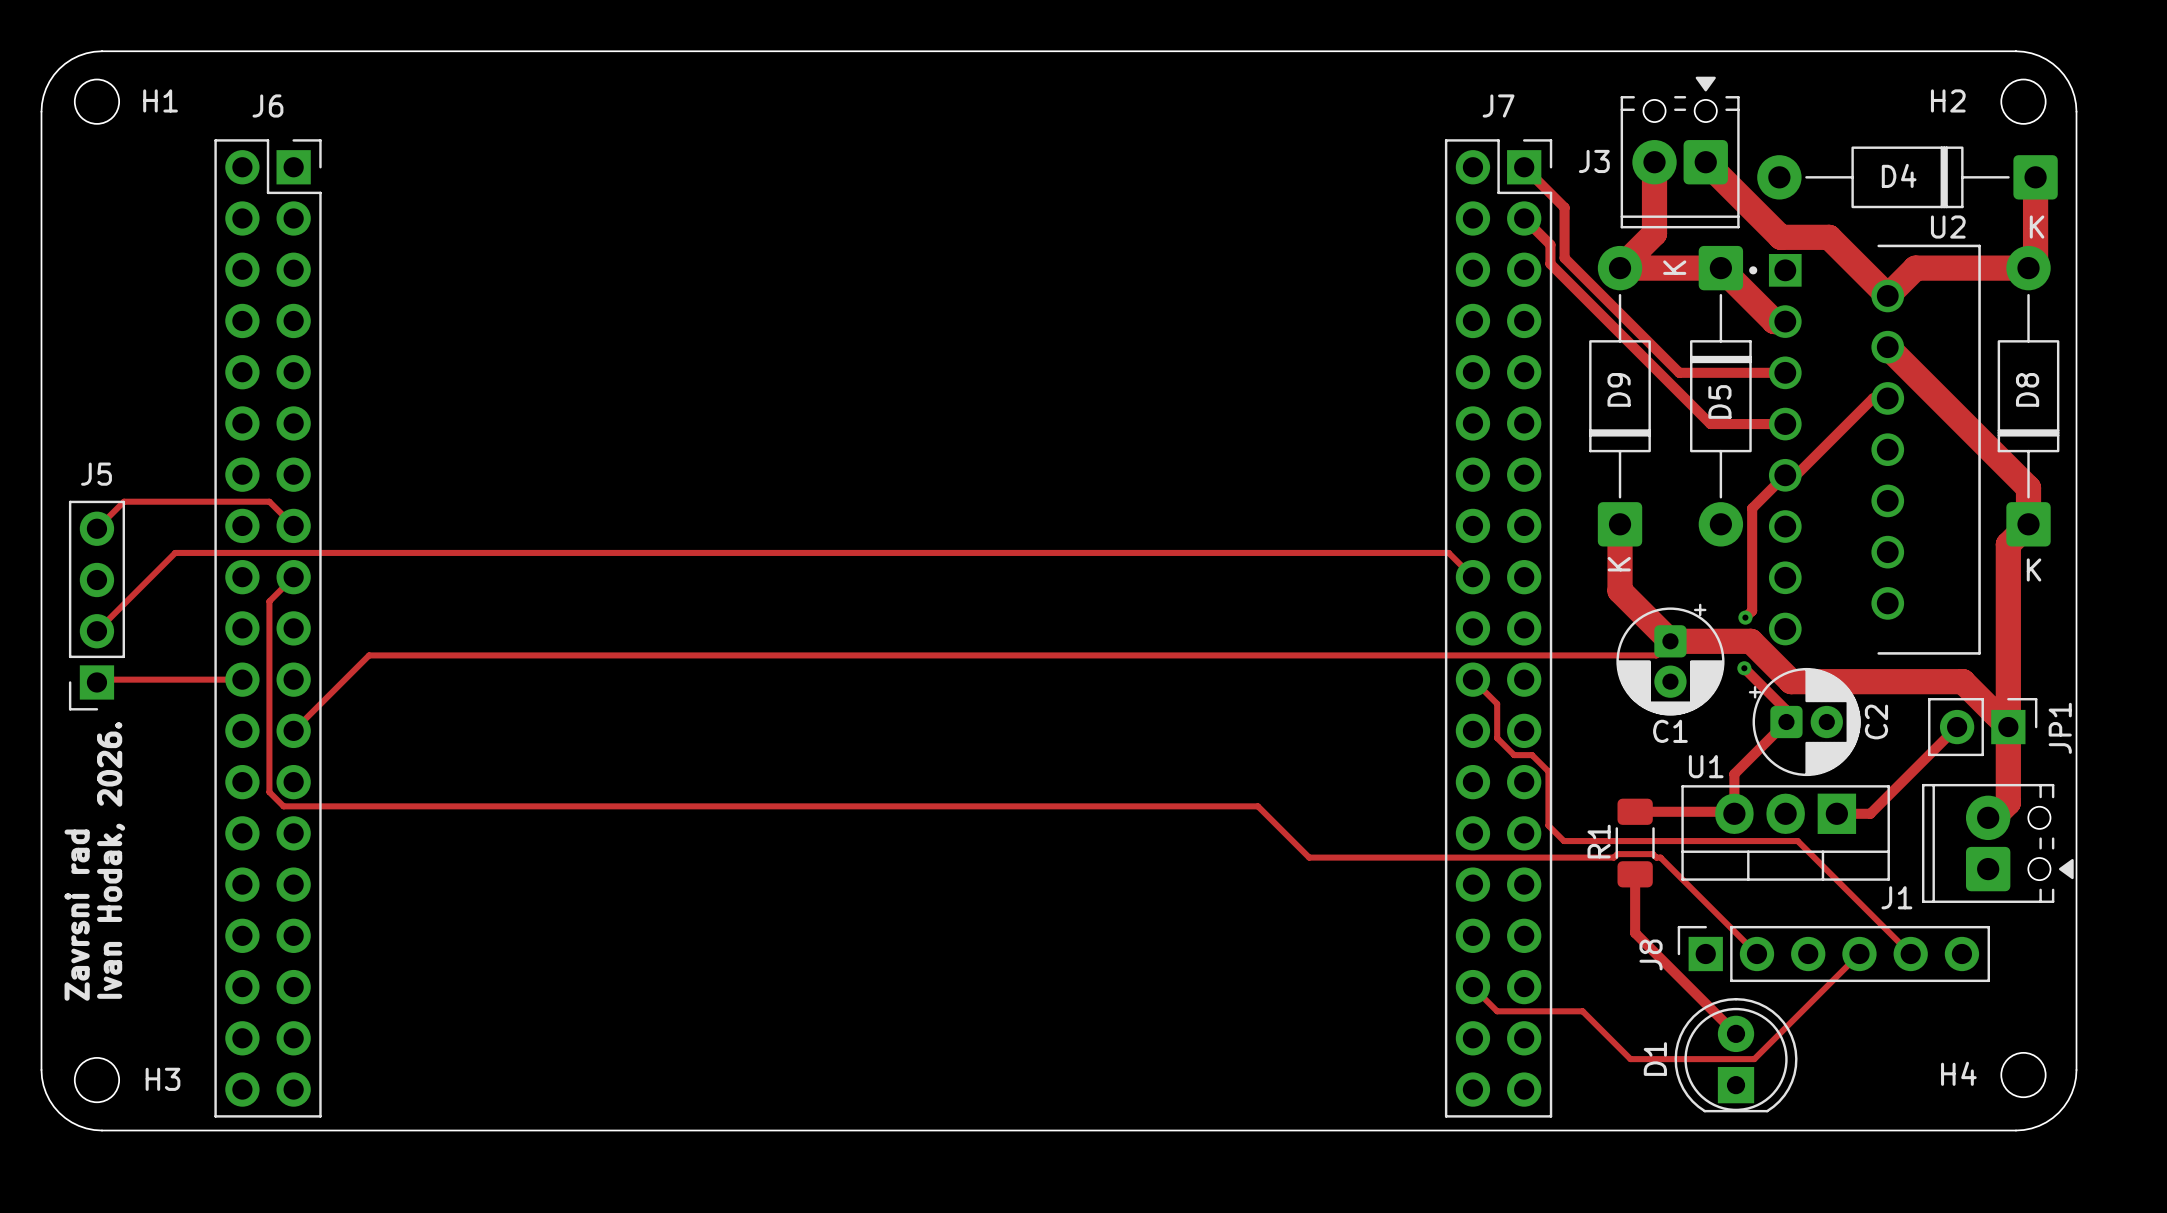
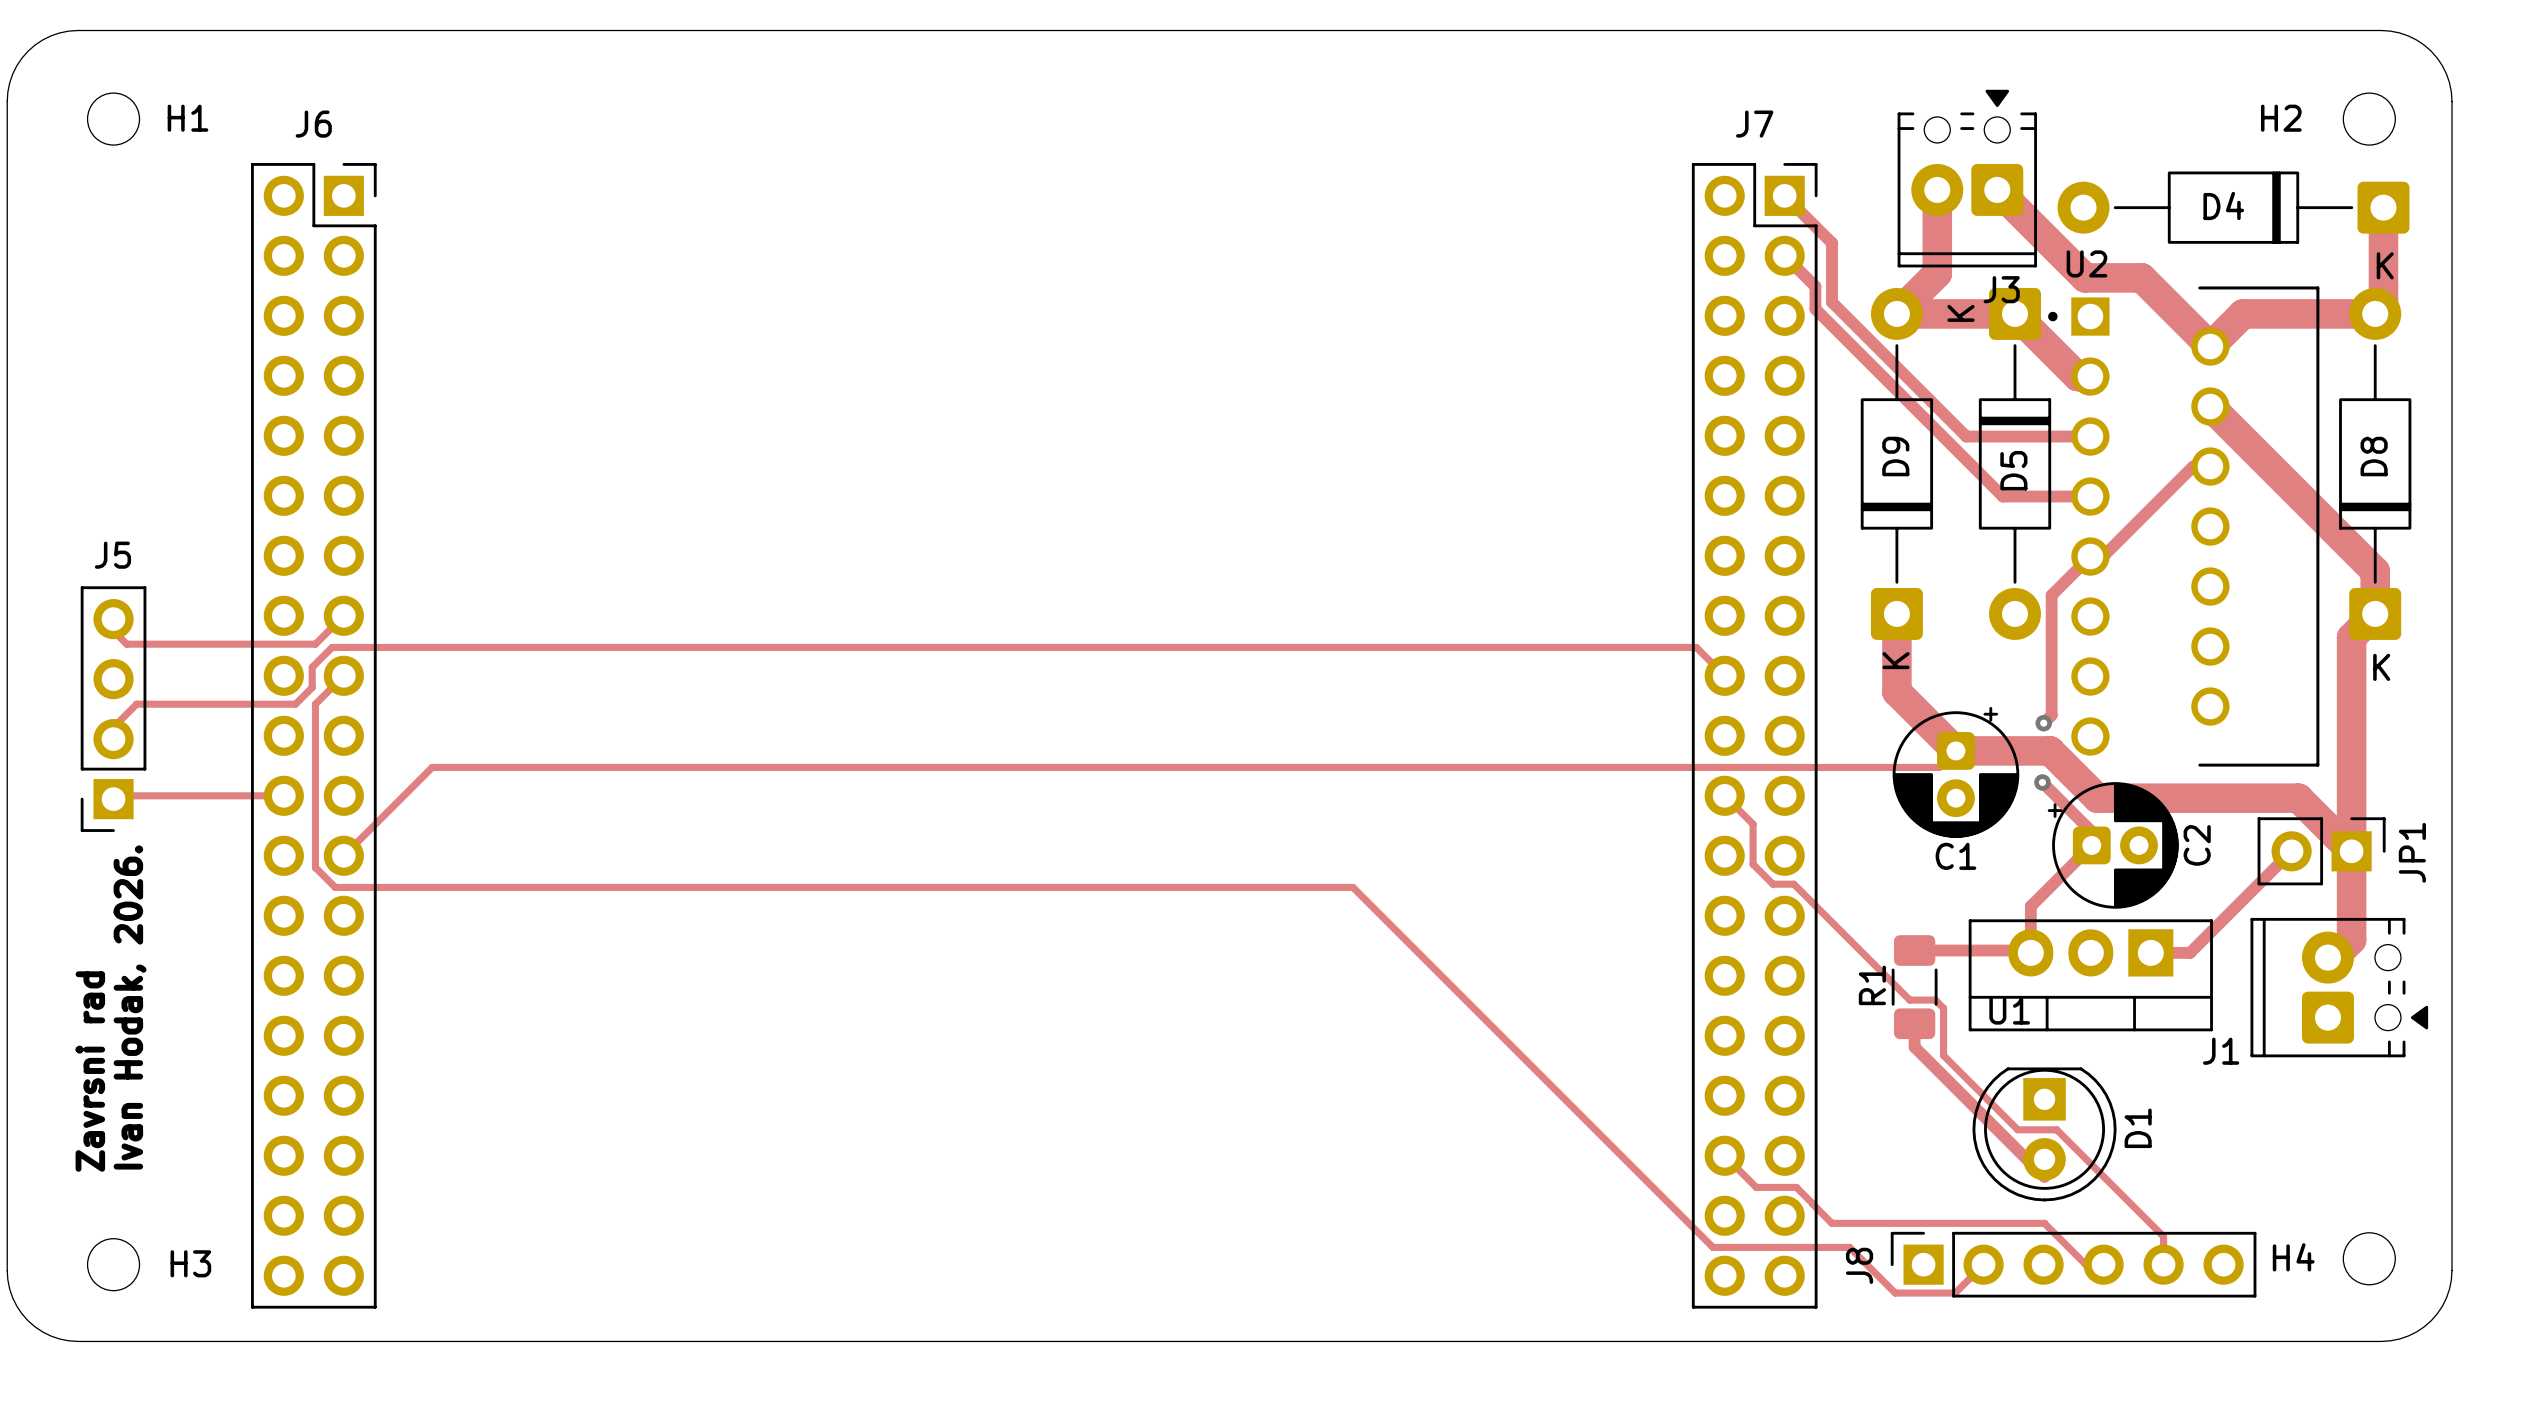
board edge: (102, 51) (2015, 51) (2031, 53) (2046, 59) (2058, 68) (2068, 81) (2074, 96) (2076, 111) (2076, 1069) (2074, 1085) (2068, 1100) (2058, 1112) (2046, 1122) (2031, 1128) (2015, 1130) (102, 1130) (86, 1128) (71, 1122) (59, 1112) (49, 1100) (43, 1085) (41, 1069) (41, 111) (46, 88) (59, 68) (78, 55) (102, 51) -> (78, 30) (50, 35) (28, 51) (12, 74) (7, 101) (7, 1270) (9, 1288) (16, 1306) (28, 1320) (42, 1331) (59, 1339) (78, 1341) (2381, 1341) (2399, 1339) (2416, 1331) (2431, 1320) (2442, 1306) (2449, 1288) (2451, 1270) (2451, 101) (2449, 83) (2442, 65) (2431, 51) (2416, 39) (2399, 32) (2381, 30) (78, 30)
J3 name position: J3 (1594, 161) -> J3 (2001, 289)
U2 name position: U2 (1948, 227) -> U2 (2086, 263)
track: (293, 525) (269, 501) (124, 501) (96, 528) -> (343, 615) (315, 644) (126, 644) (101, 619)
track: (283, 552) (175, 552) (96, 631) -> (332, 647) (312, 667) (312, 687) (295, 704) (136, 704) (101, 739)
track: (269, 740) (269, 792) (283, 806) (1257, 806) (1309, 857) (1613, 857) (1617, 854) (1631, 854) -> (315, 867) (335, 887) (1352, 887) (1712, 1247) (1849, 1247) (1895, 1293) (1955, 1293) (1983, 1264)
U1 name position: U1 (1706, 766) -> U1 (2009, 1011)
track: (1548, 771) (1548, 825) (1563, 841) (1797, 841) (1910, 954) -> (1813, 903) (1909, 1000)
track: (1656, 857) (1660, 857) (1756, 954) -> (1939, 1004) (1943, 1008) (1943, 1055) (2017, 1129) (2056, 1129) (2163, 1236) (2163, 1264)
track: (1635, 894) (1635, 933) (1736, 1033) -> (1914, 1047) (2044, 1177)
J8 position: (1833, 954) -> (2073, 1264)
track: (1859, 954) (1754, 1059) (1630, 1059) (1582, 1011) (1497, 1011) -> (1813, 1204) (1796, 1187) (1756, 1187) (1753, 1184)
track: none -> (1813, 1204) (1831, 1223) (2044, 1223) (2085, 1264) (2103, 1264)
D1 rotation: 0° (1736, 1055) -> 180° (2044, 1134)
D1 position: (1736, 1055) -> (2044, 1134)

